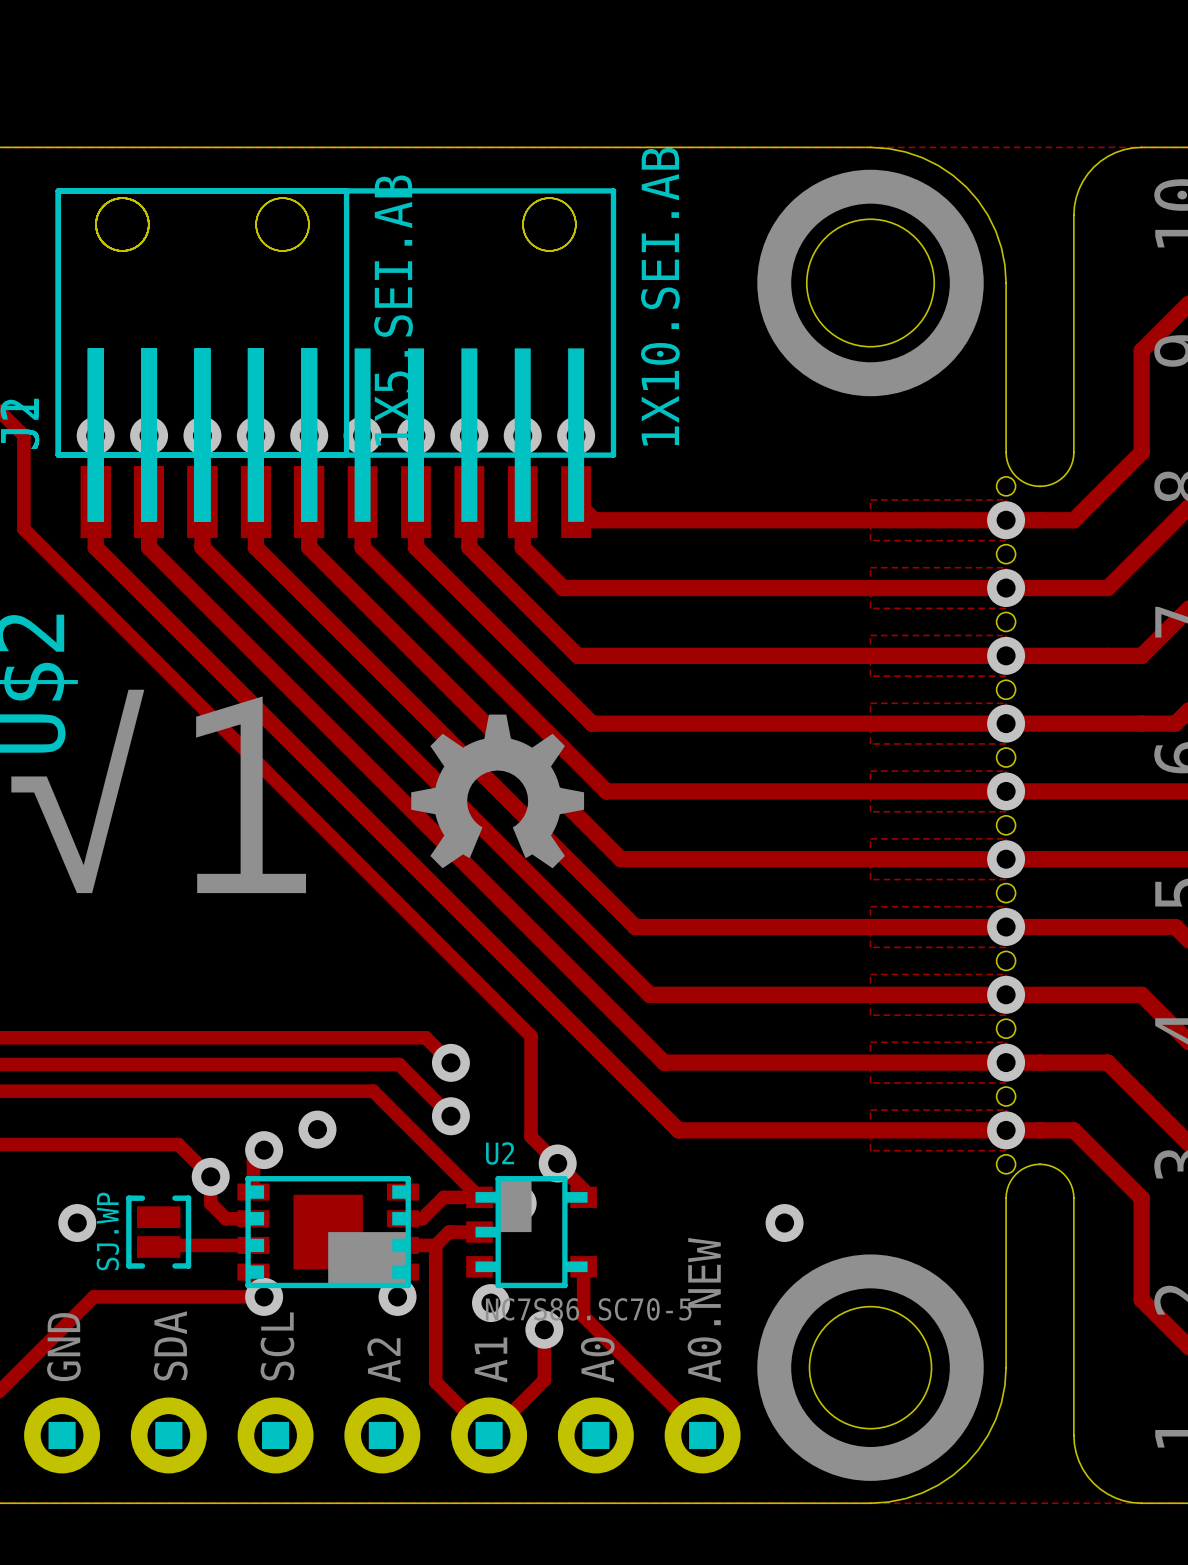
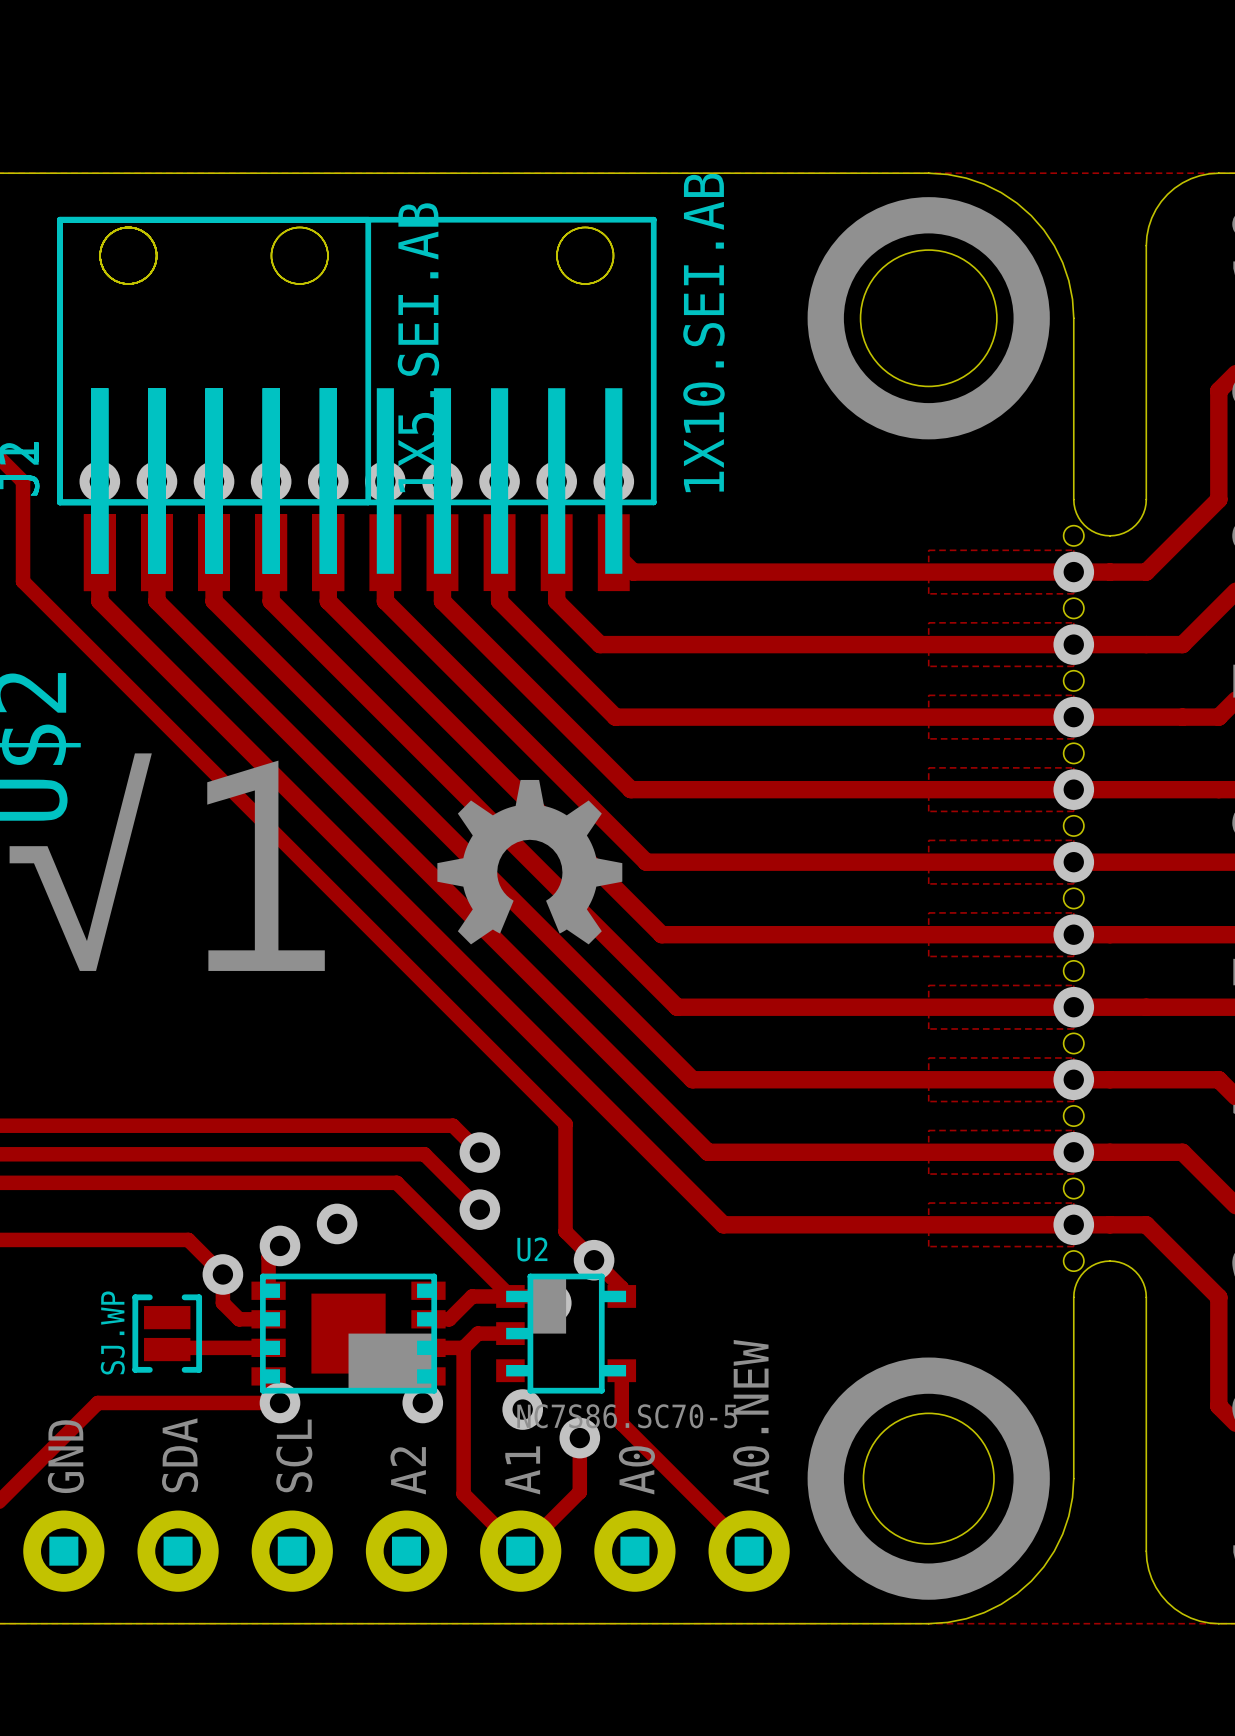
via: (77, 1223) -> none
via: (784, 1223) -> none

